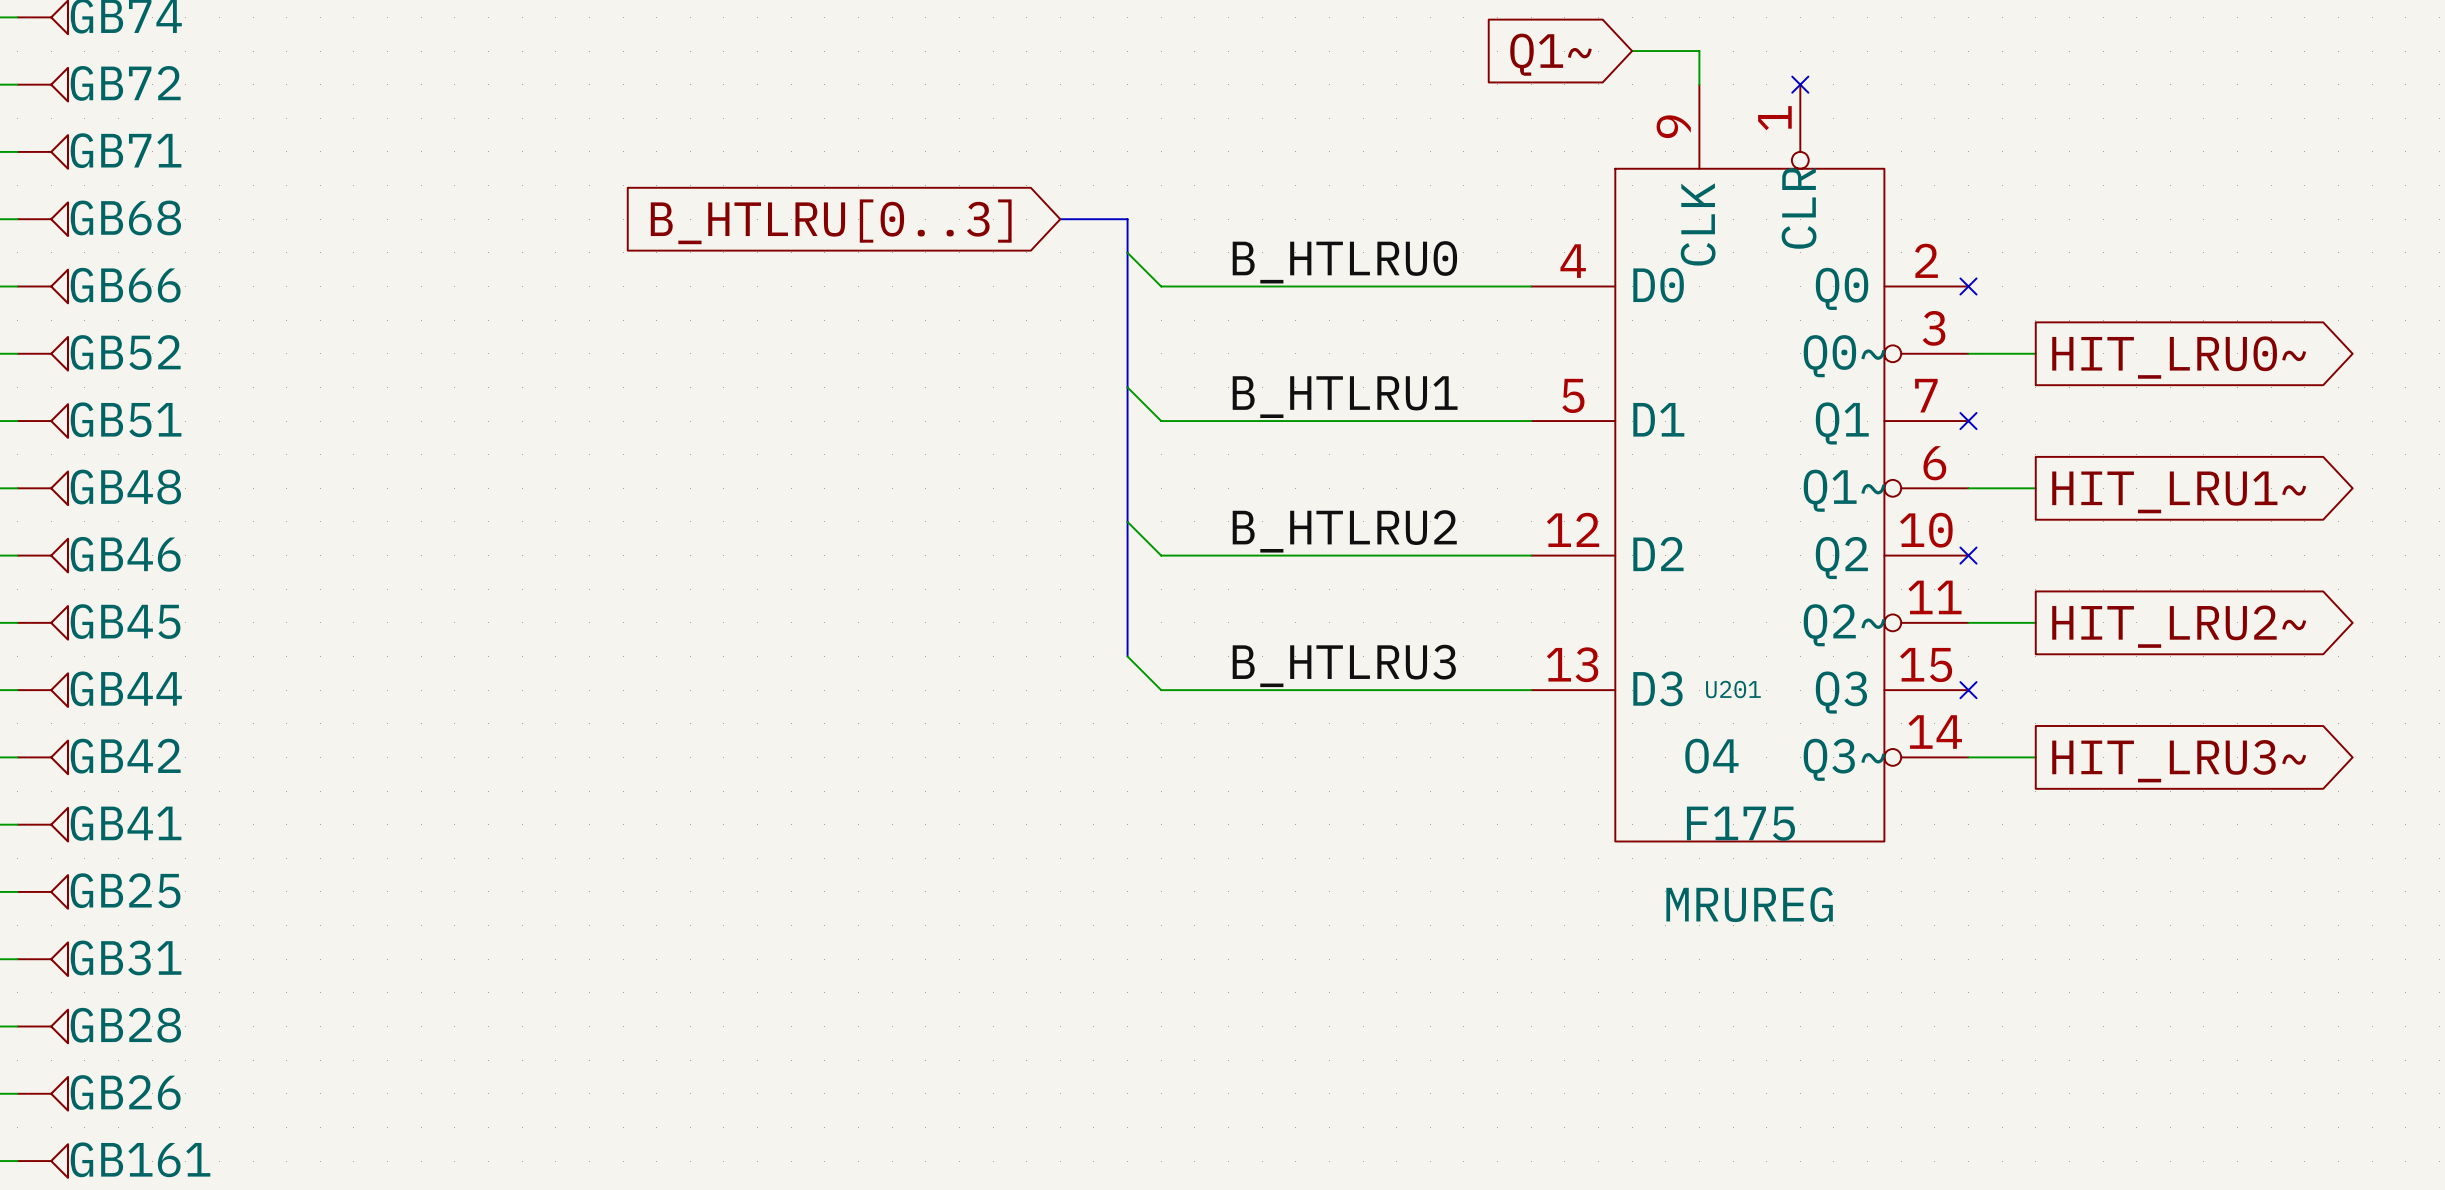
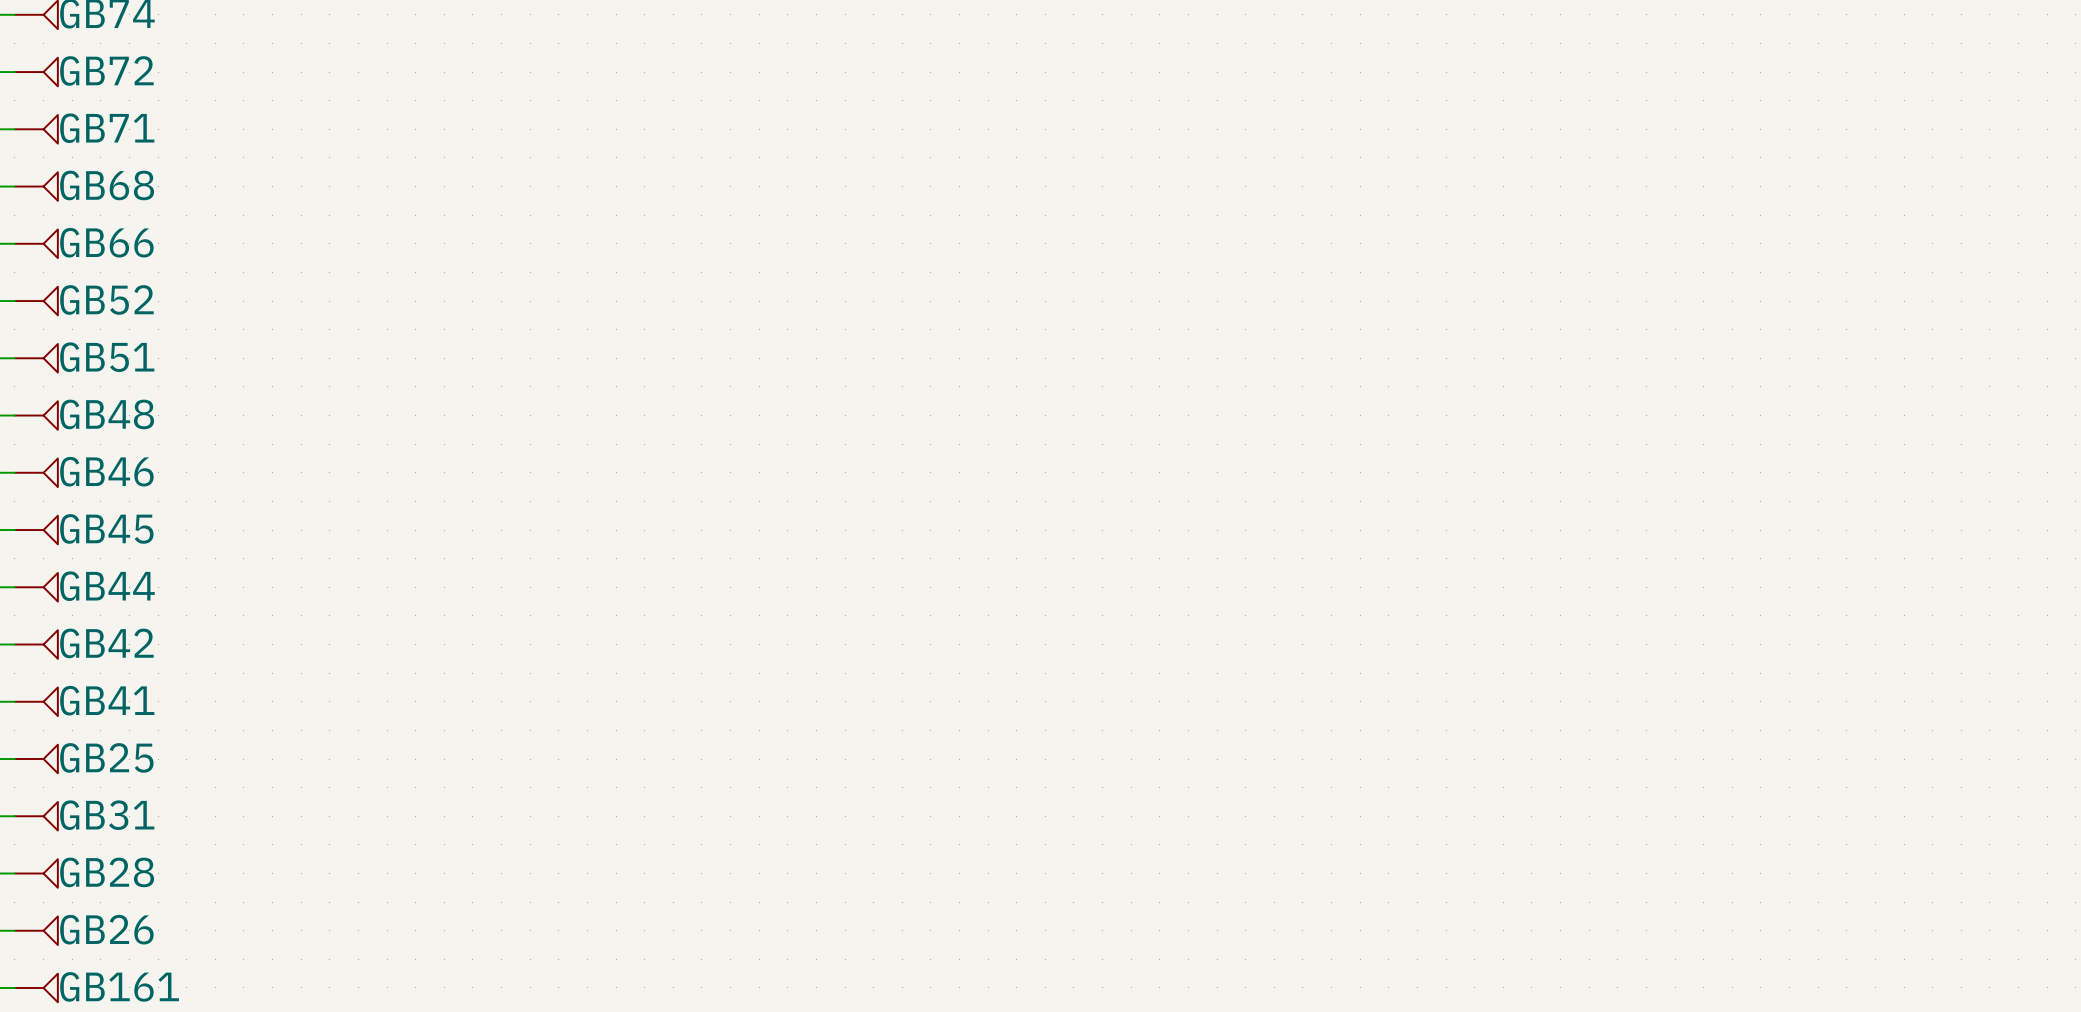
wire: (1632, 51) (1699, 51) (1699, 84) -> none
global label: Q1~ (1551, 54) -> none
no-connect mark: (1800, 84) -> none
bus: (1060, 219) (1127, 219) (1127, 656) -> none
global label: B_HTLRU[0..3] (831, 221) -> none
wire: (1127, 252) (1161, 286) (1531, 286) -> none
label: B_HTLRU0 (1344, 262) -> none
no-connect mark: (1968, 286) -> none
wire: (1968, 353) (2035, 353) -> none
global label: HIT_LRU0~ (2179, 357) -> none
wire: (1127, 387) (1161, 421) (1531, 421) -> none
label: B_HTLRU1 (1345, 397) -> none
no-connect mark: (1968, 421) -> none
U201: F175 (1749, 463) -> none
wire: (1968, 488) (2035, 488) -> none
global label: HIT_LRU1~ (2179, 492) -> none
wire: (1127, 521) (1161, 555) (1531, 555) -> none
label: B_HTLRU2 (1344, 531) -> none
no-connect mark: (1968, 555) -> none
wire: (1968, 622) (2035, 622) -> none
global label: HIT_LRU2~ (2179, 626) -> none
wire: (1127, 656) (1161, 690) (1531, 690) -> none
label: B_HTLRU3 (1344, 665) -> none
no-connect mark: (1968, 690) -> none
wire: (1968, 757) (2035, 757) -> none
global label: HIT_LRU3~ (2179, 761) -> none

